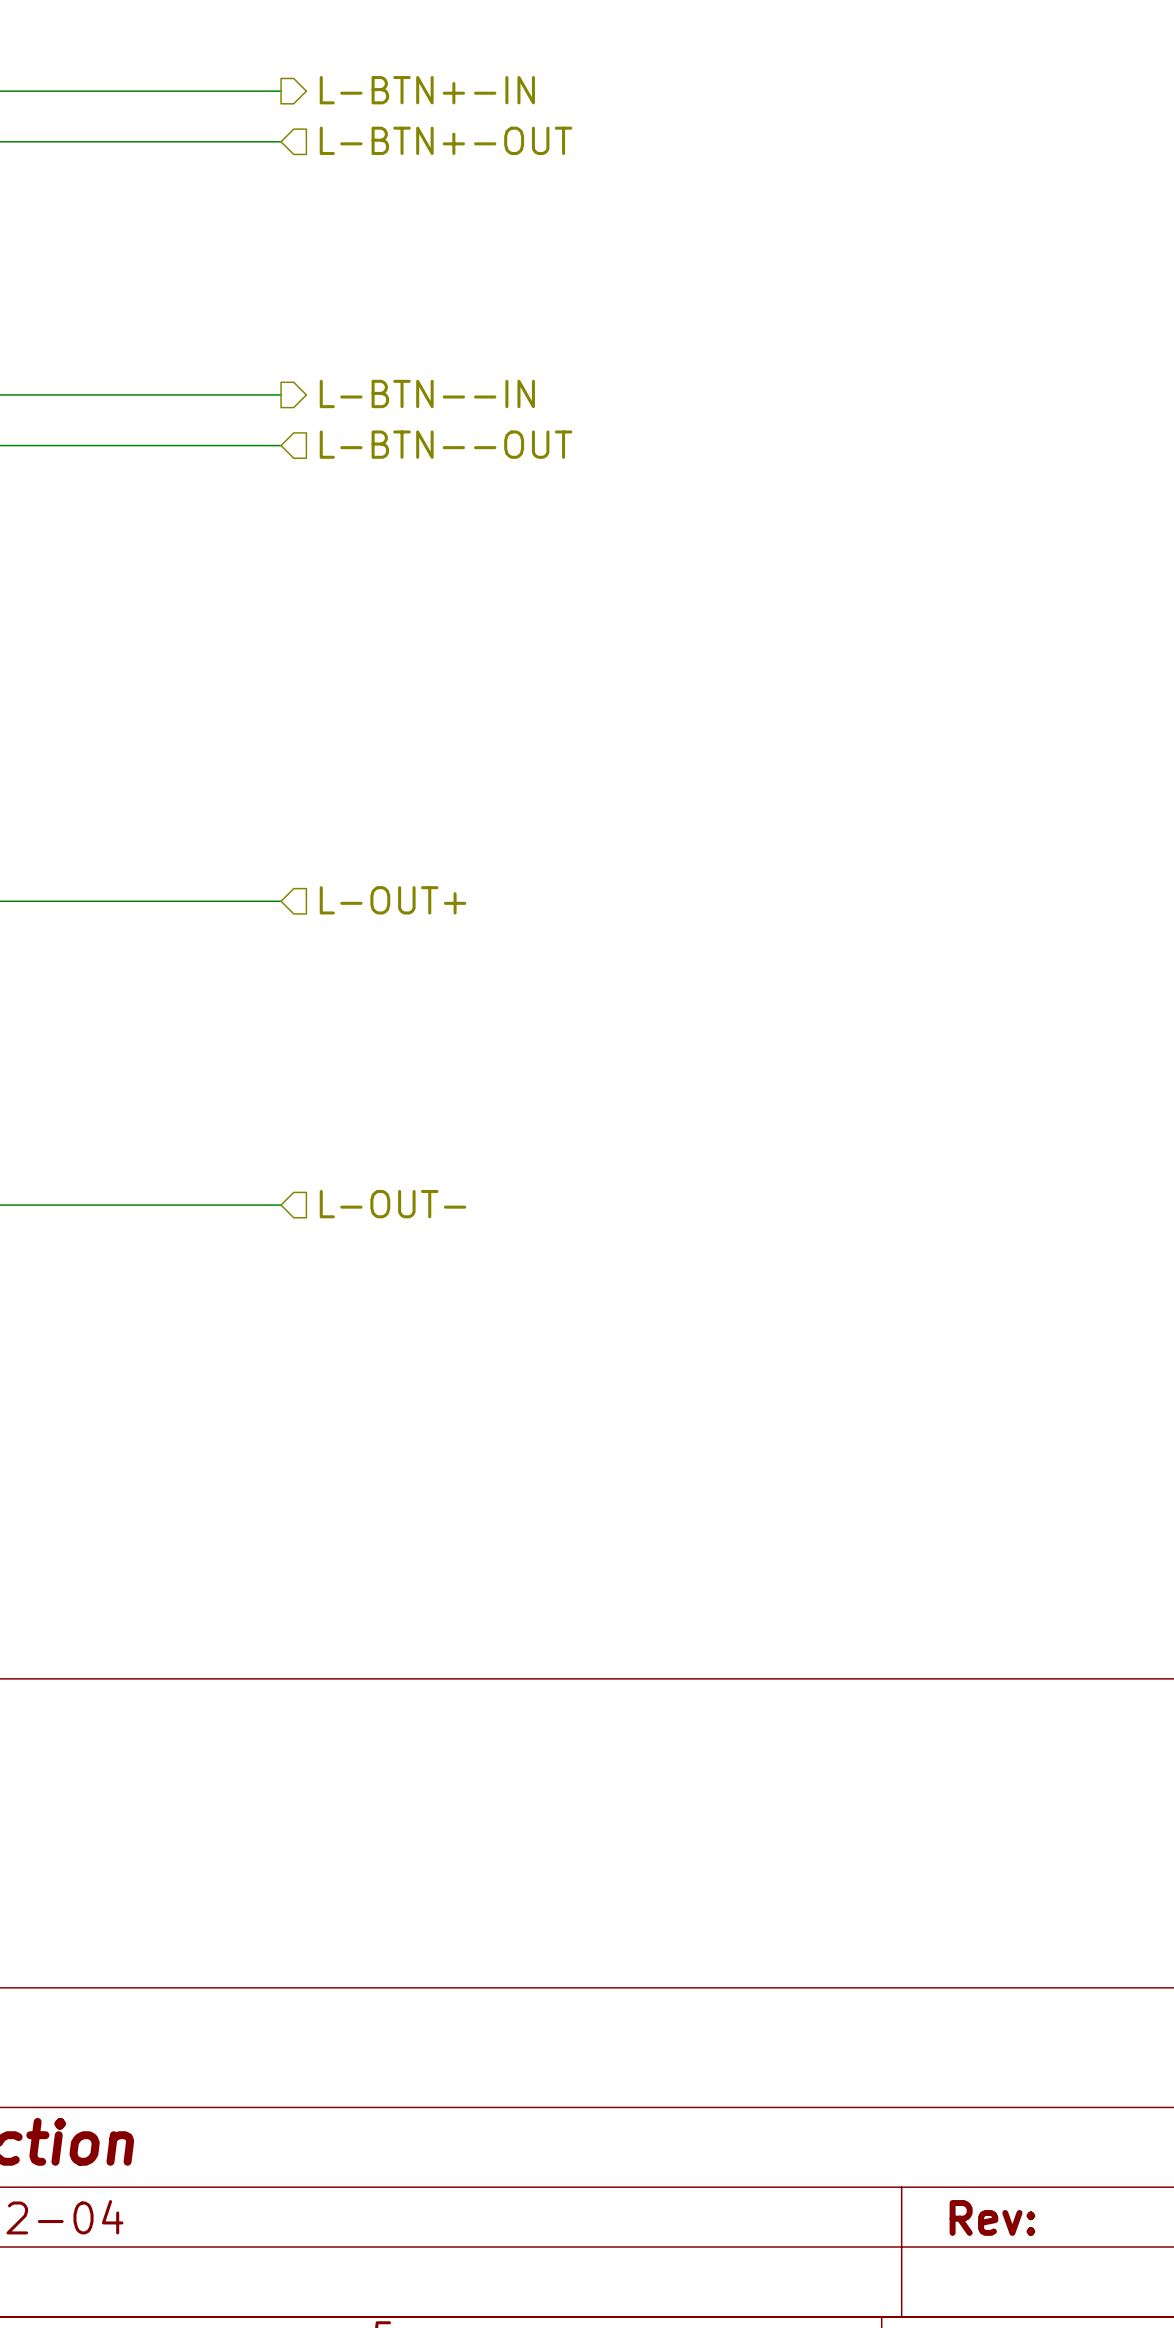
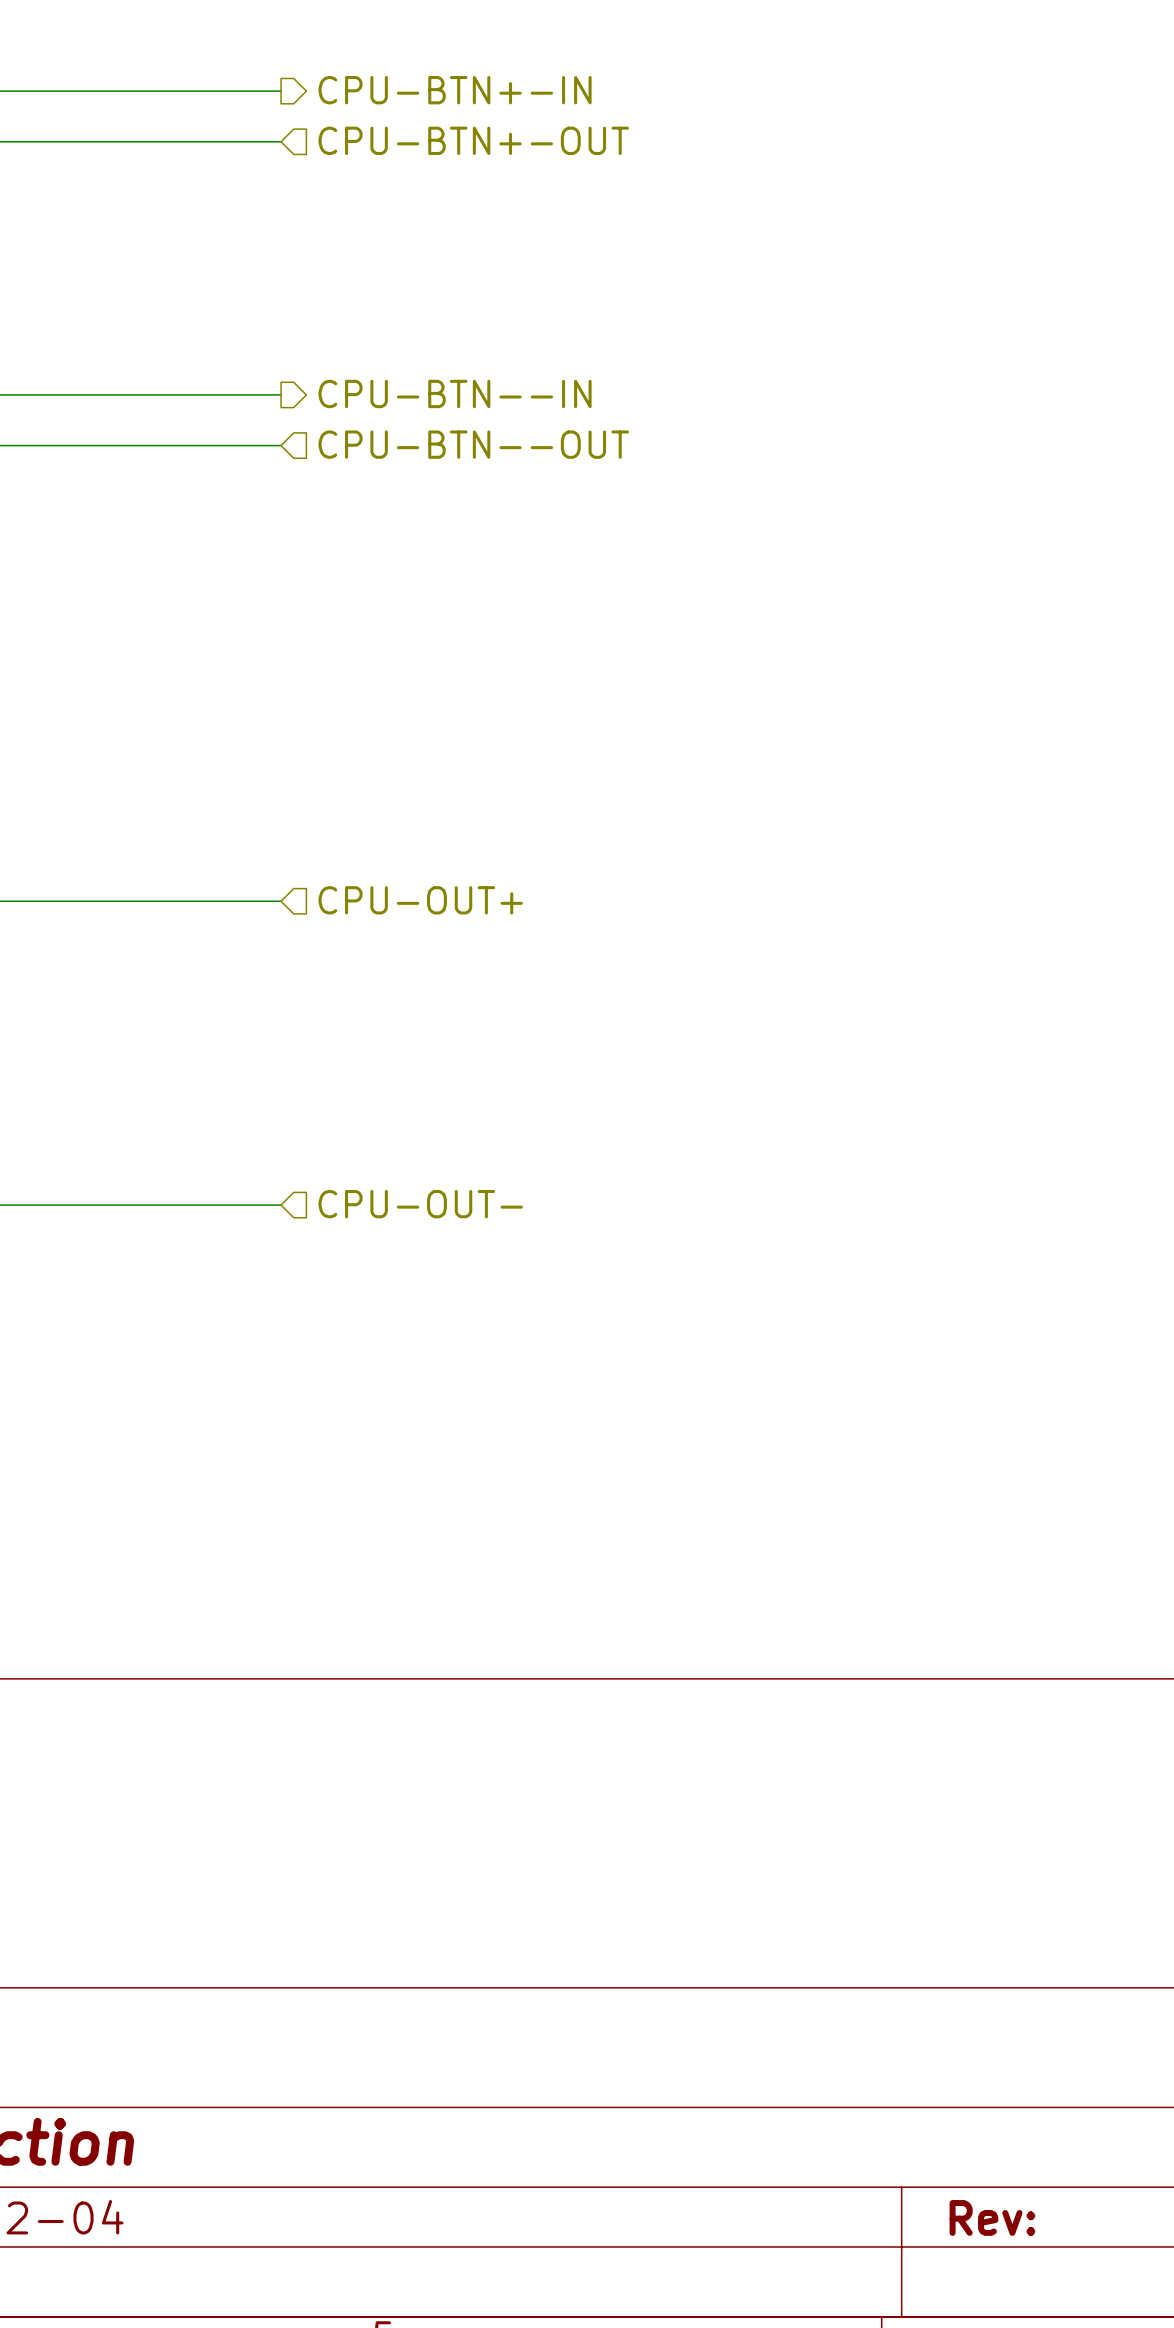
hierarchical label: L-BTN+-IN (427, 90) -> CPU-BTN+-IN (455, 90)
hierarchical label: L-BTN+-OUT (446, 140) -> CPU-BTN+-OUT (473, 140)
hierarchical label: L-BTN--IN (427, 393) -> CPU-BTN--IN (455, 393)
hierarchical label: L-BTN--OUT (446, 444) -> CPU-BTN--OUT (473, 444)
hierarchical label: L-OUT+ (392, 900) -> CPU-OUT+ (420, 900)
hierarchical label: L-OUT- (392, 1204) -> CPU-OUT- (420, 1204)

